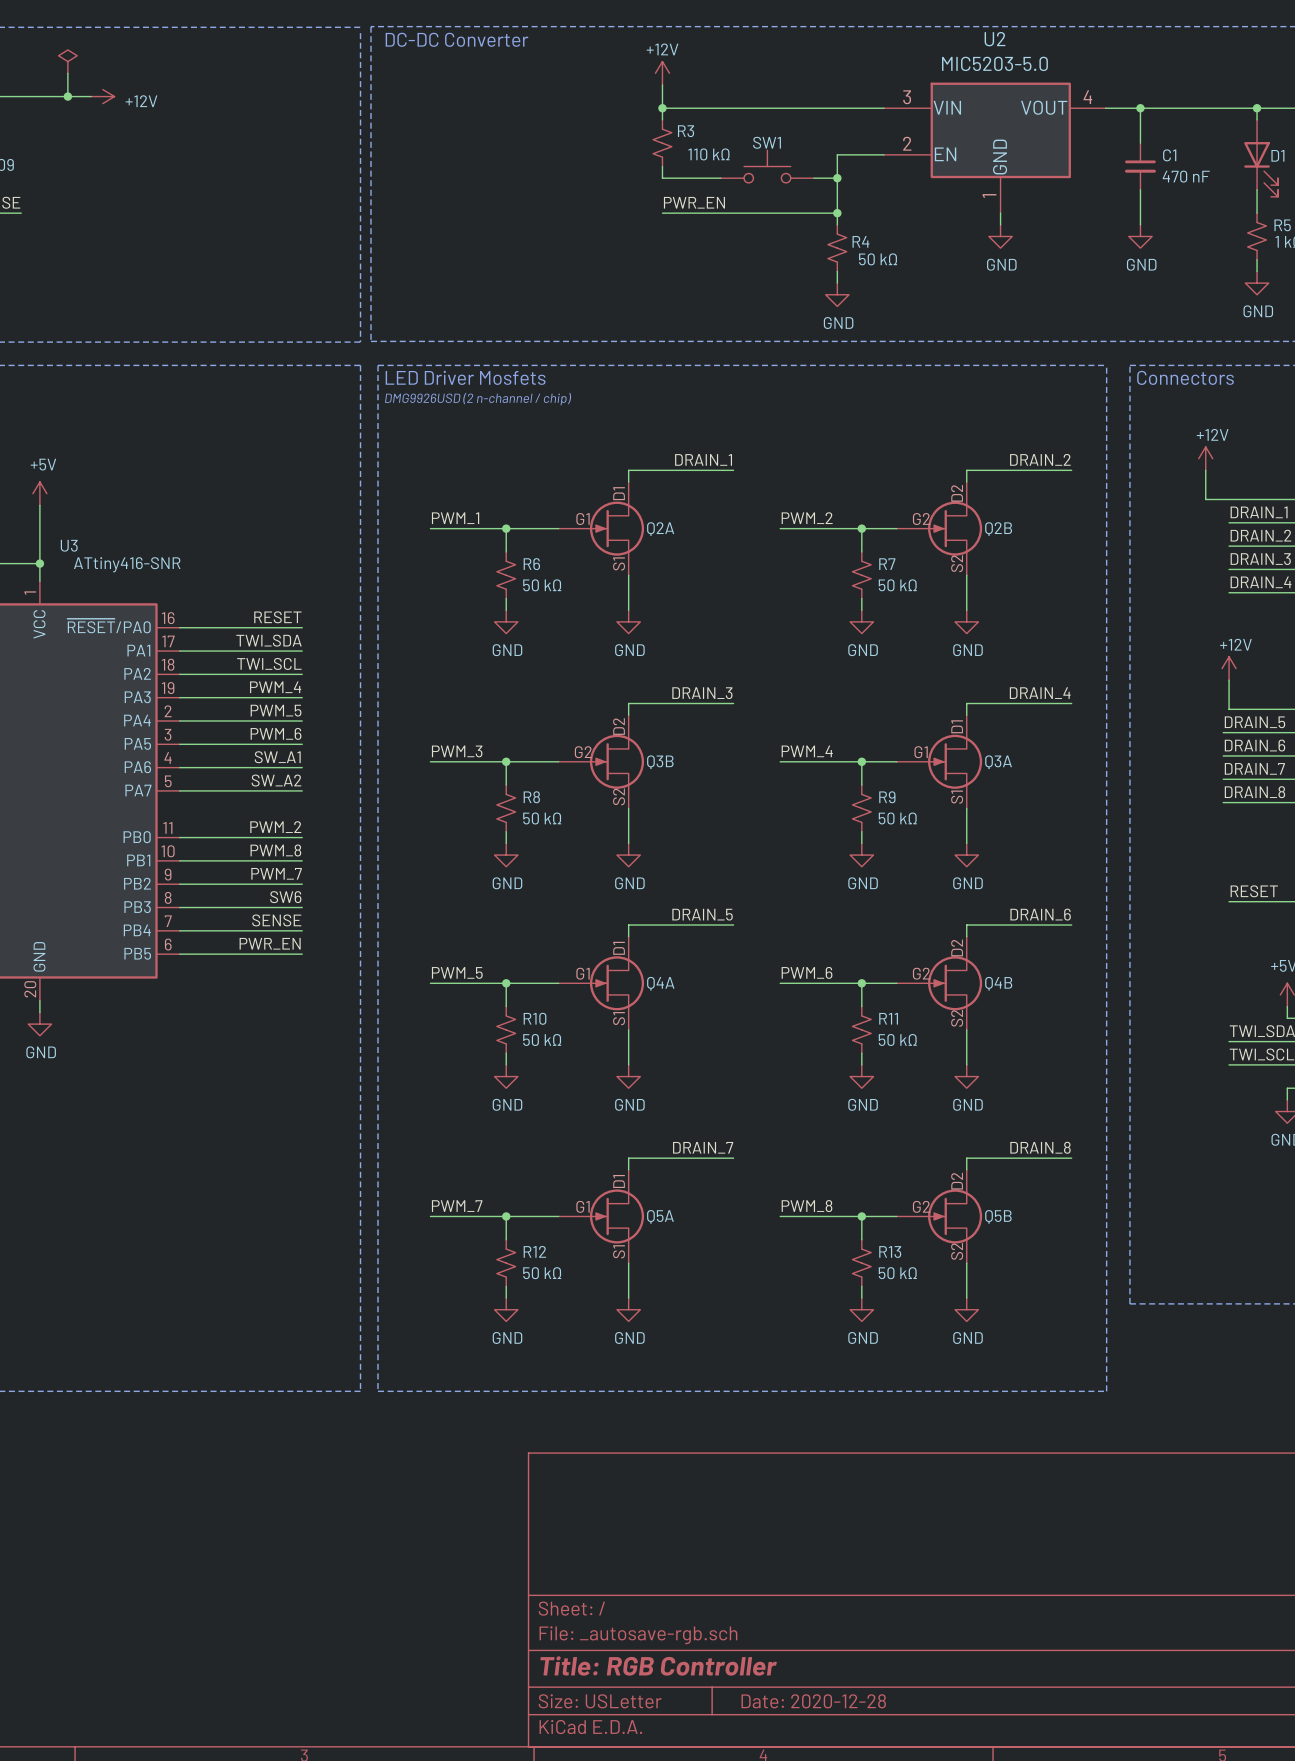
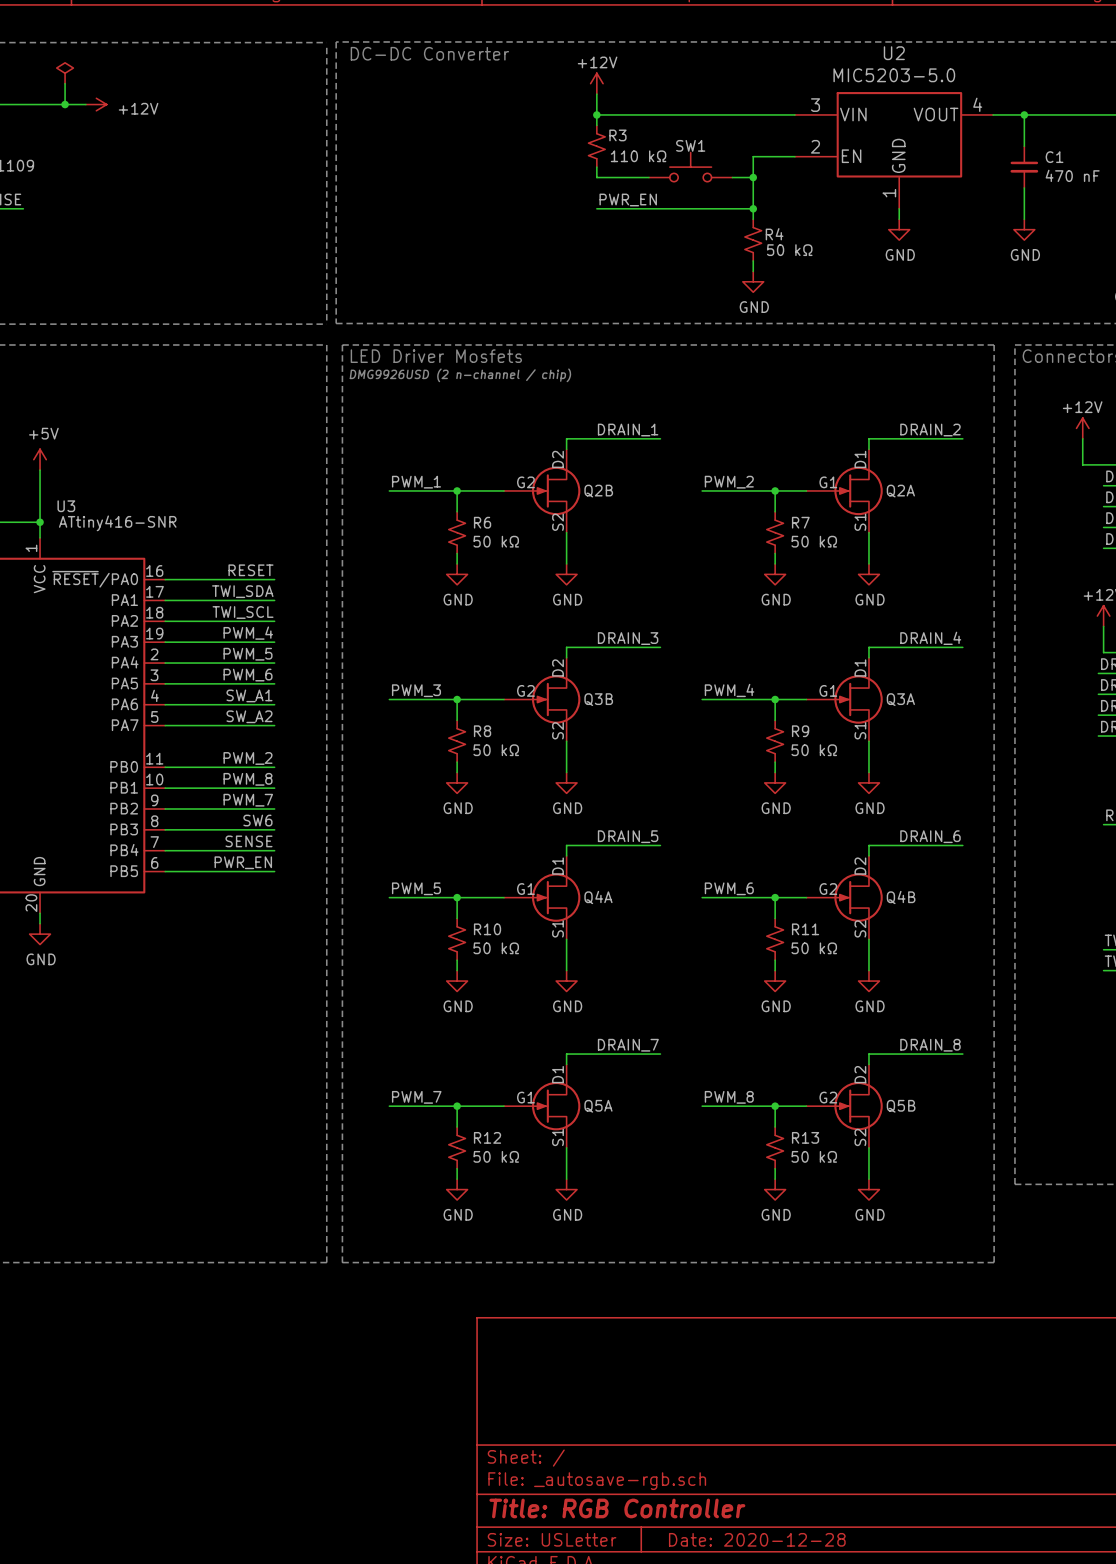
Q2A position: (601, 528) -> (844, 490)
Q2B position: (939, 528) -> (542, 490)

